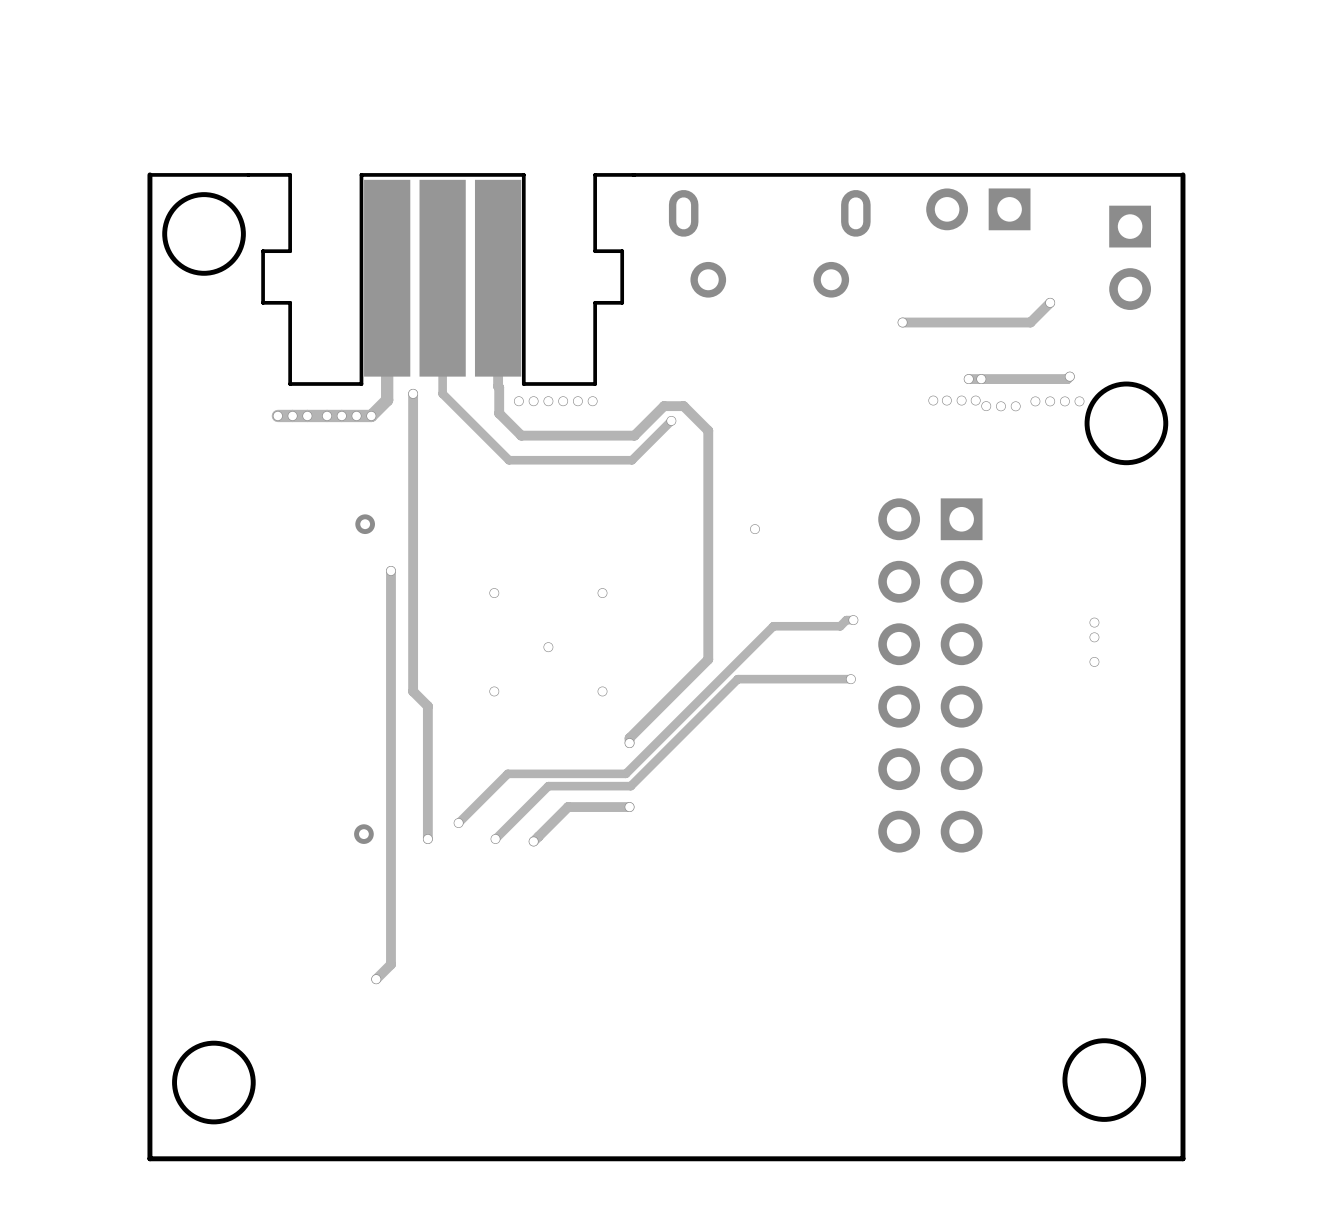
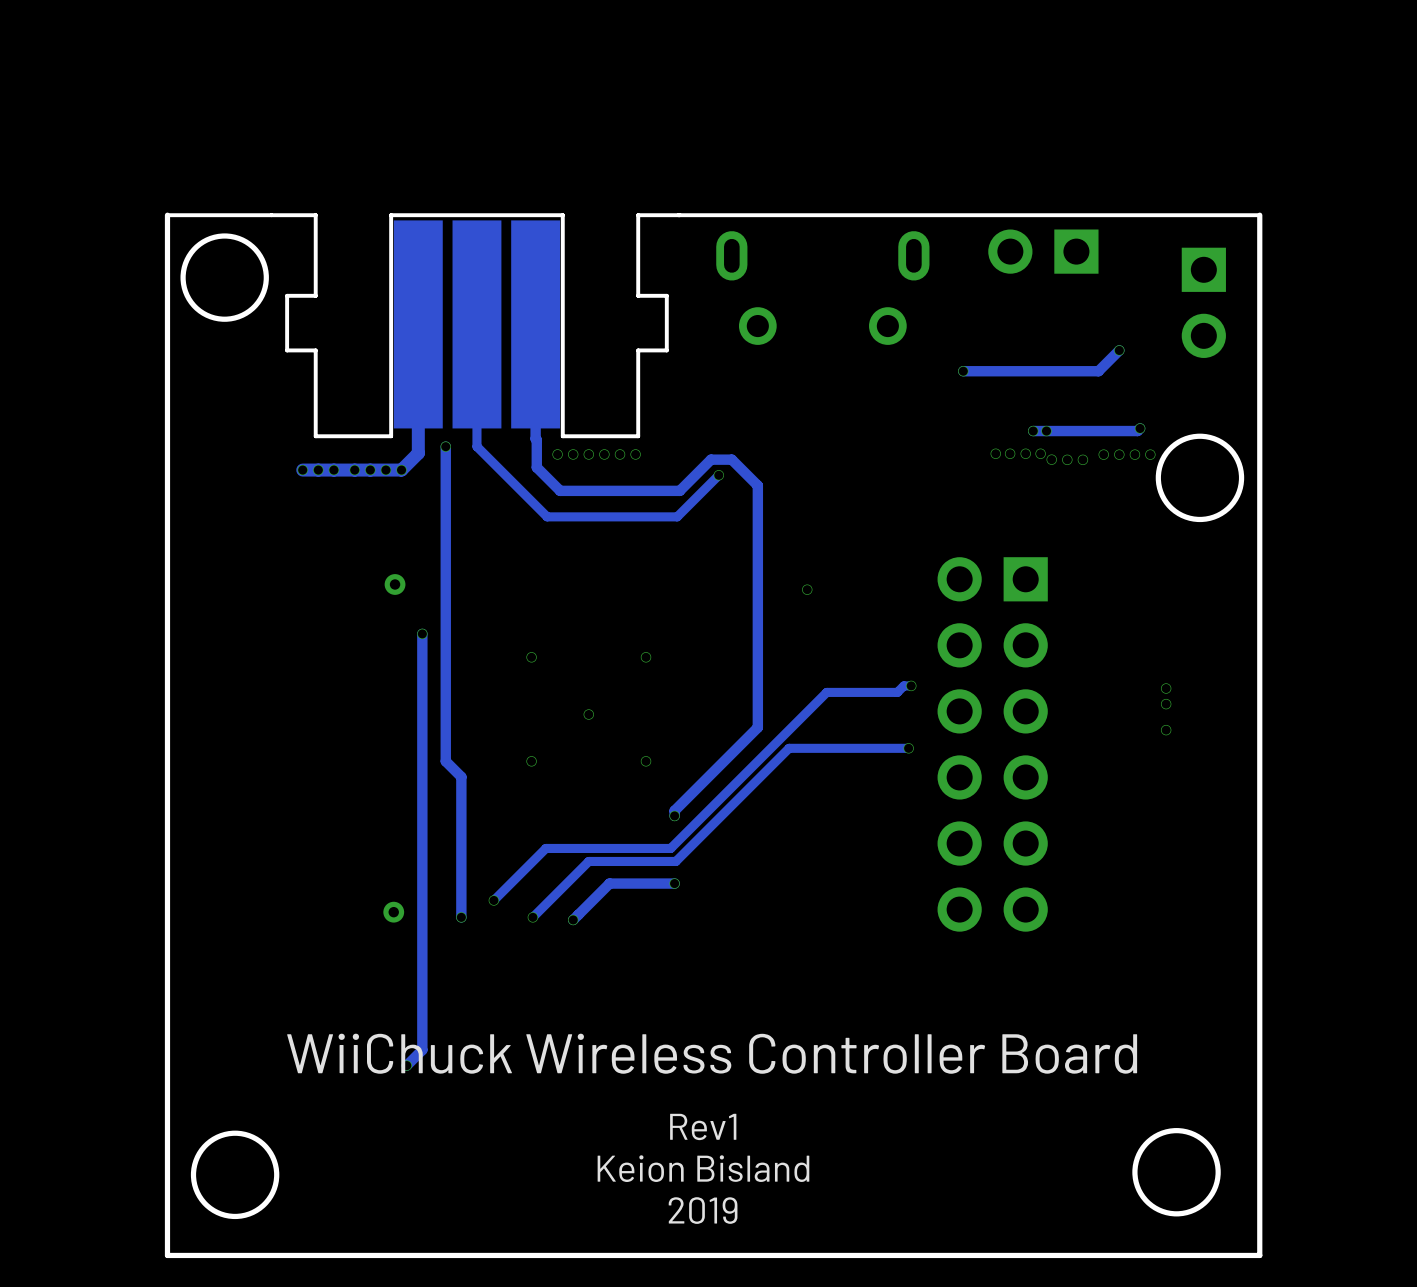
text: none -> WiiChuck Wireless Controller Board (712, 1053)
text: none -> Rev1 (703, 1126)
text: none -> Keion Bisland (703, 1168)
text: none -> 2019 (703, 1210)

